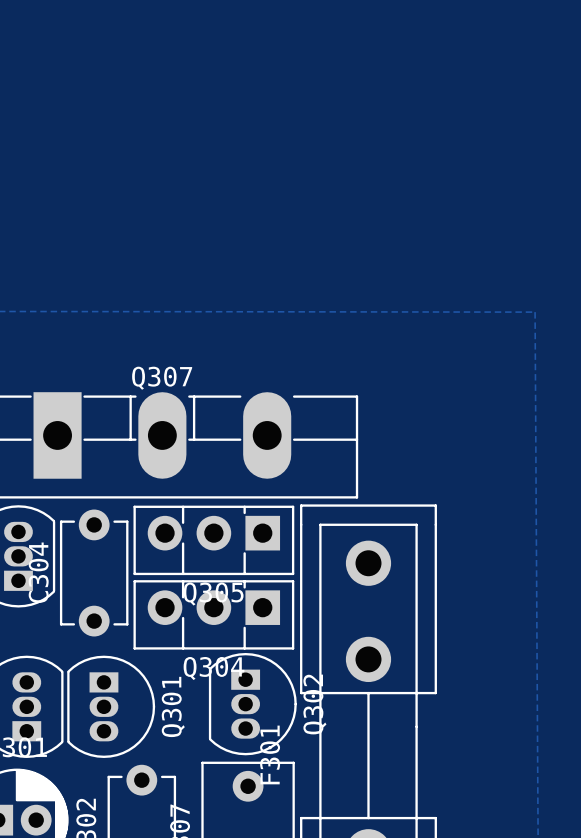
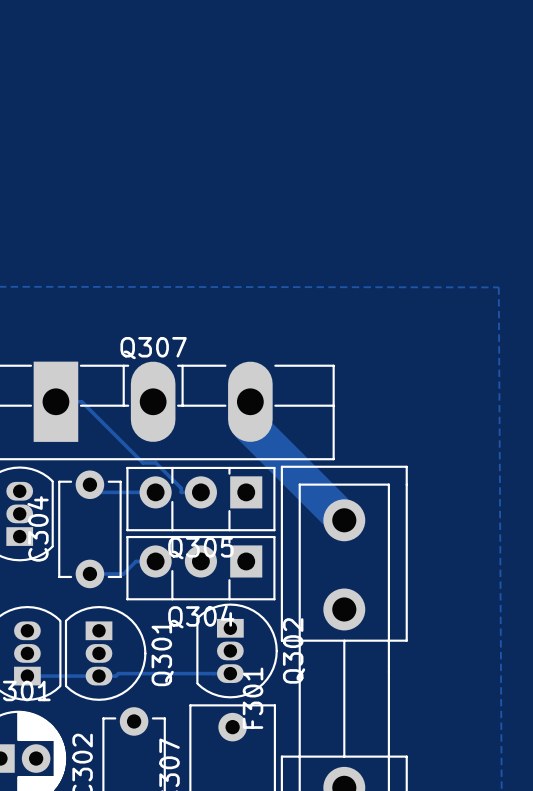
track: none -> (55, 401) (81, 401) (143, 462) (155, 462) (181, 488) (181, 492) (200, 492)
track: none -> (250, 401) (250, 426) (344, 520)
track: none -> (89, 484) (97, 492) (155, 492)
track: none -> (155, 561) (135, 561) (123, 573) (89, 573)
track: none -> (230, 673) (25, 676)

